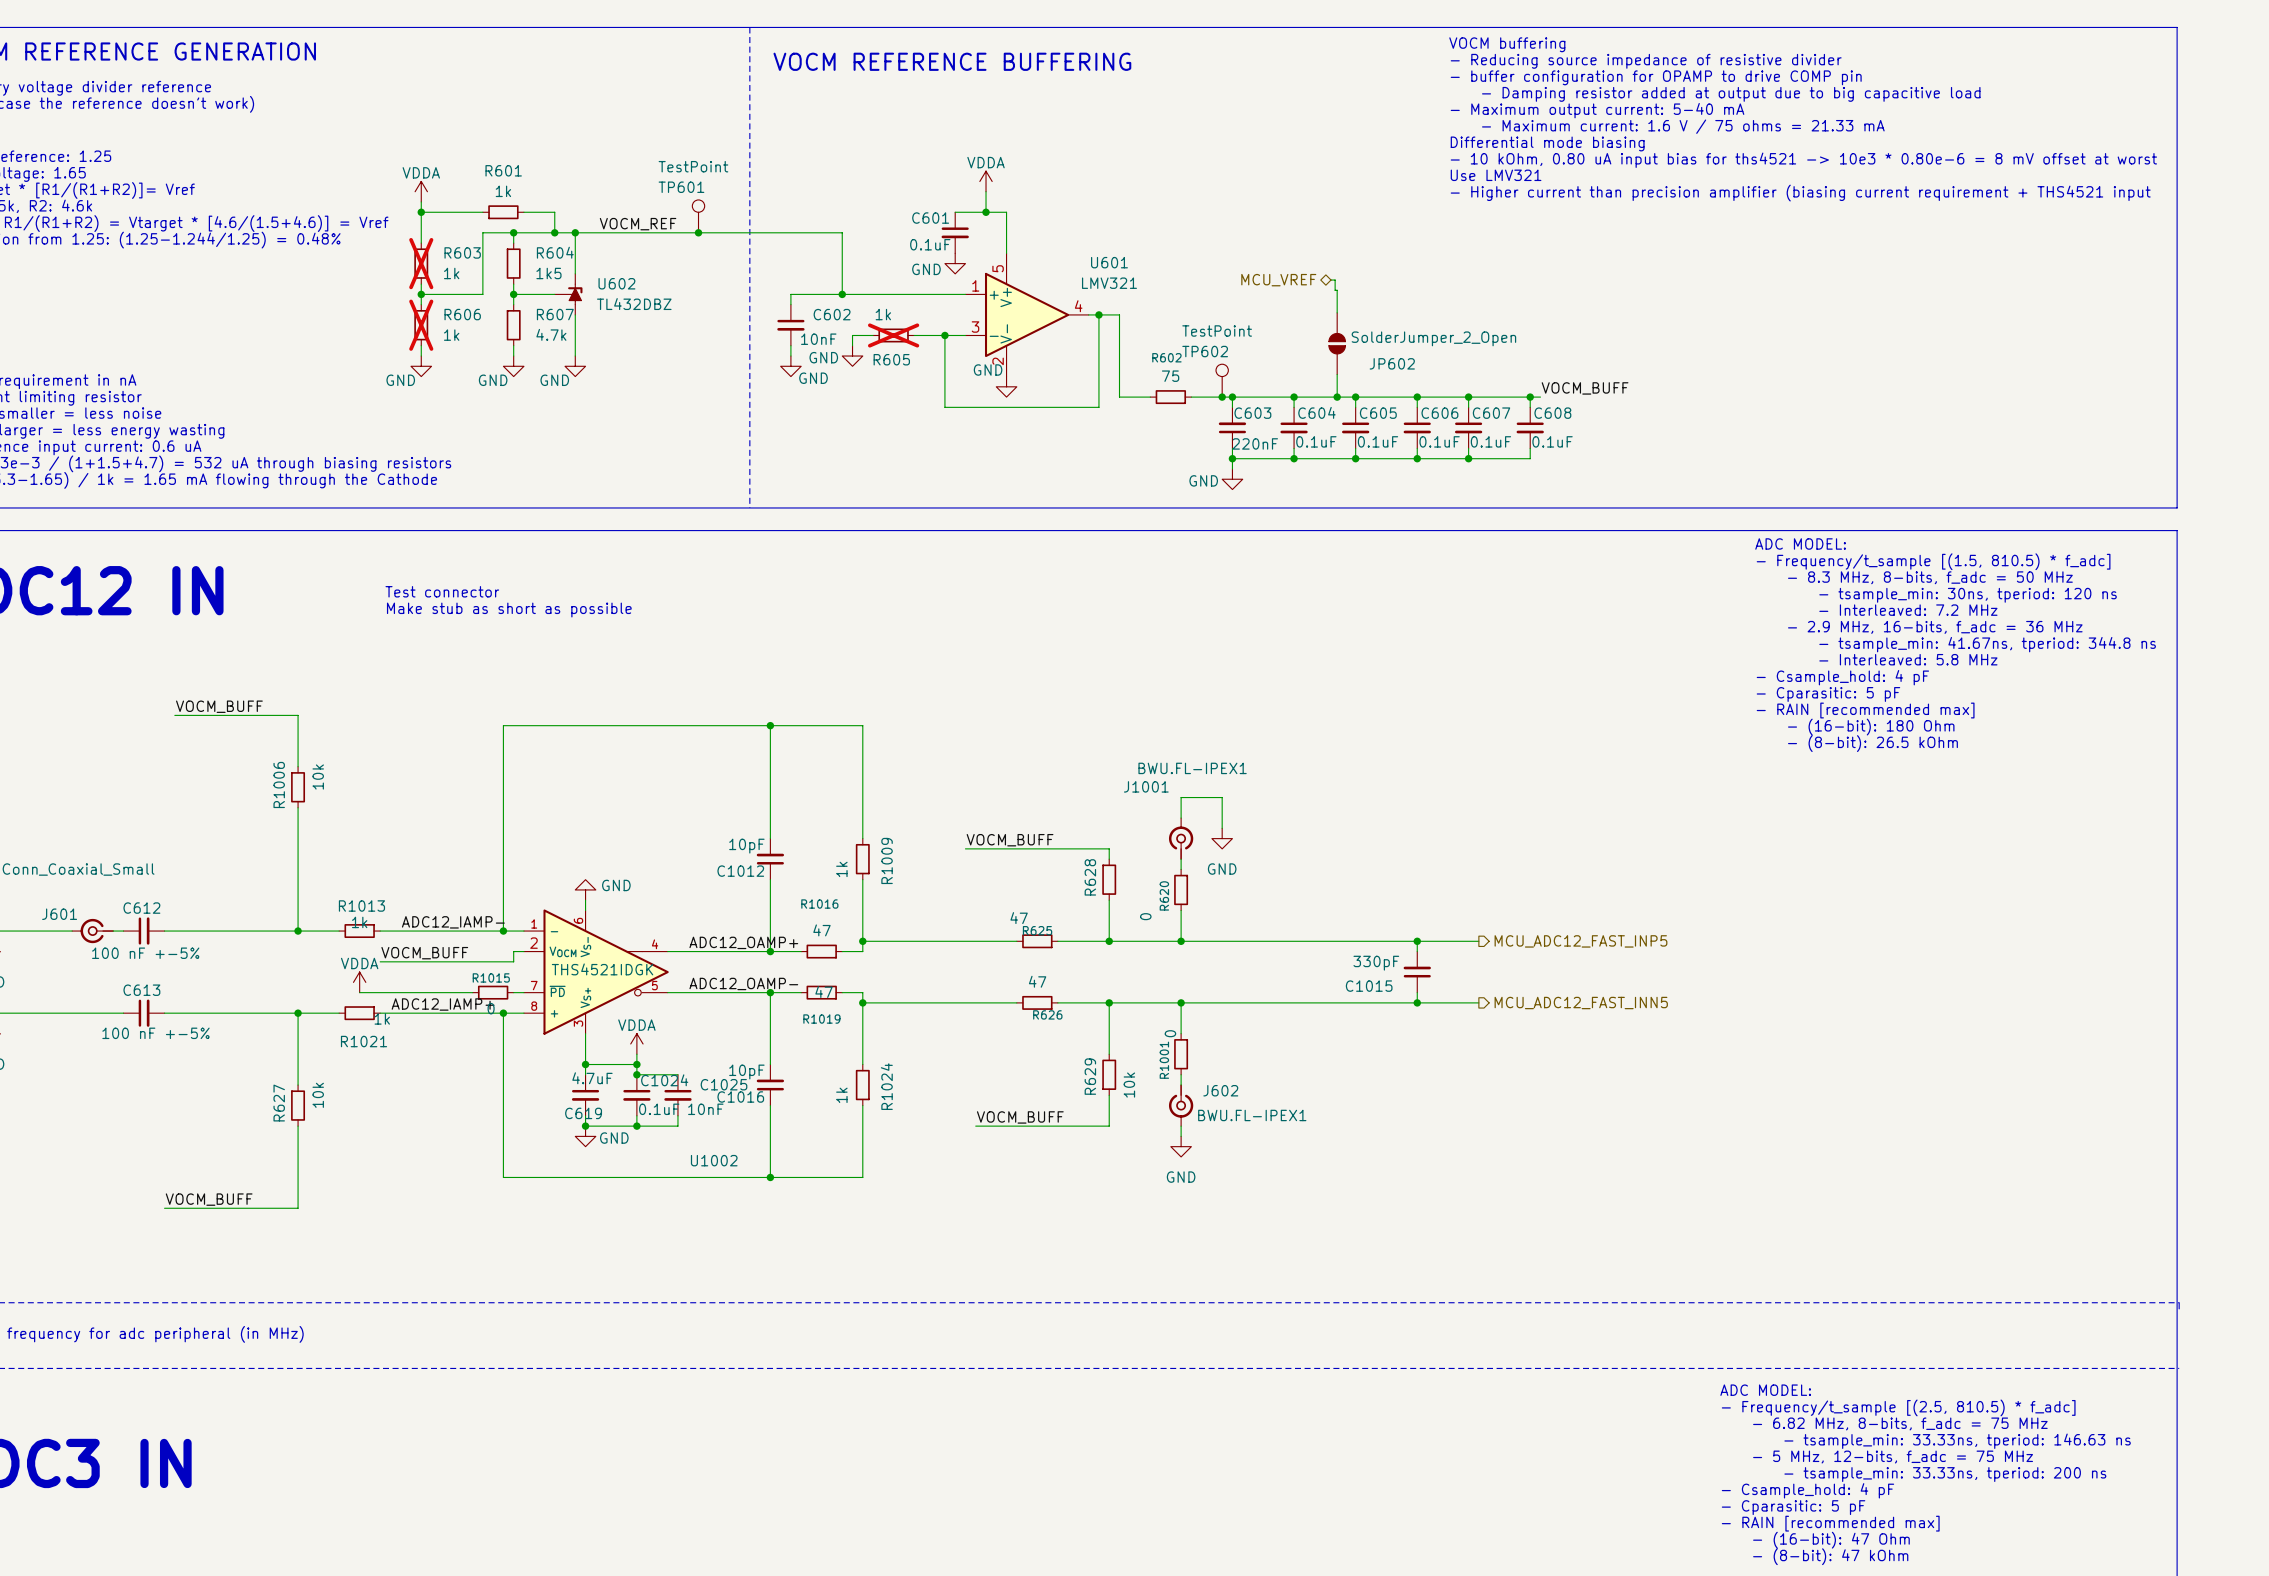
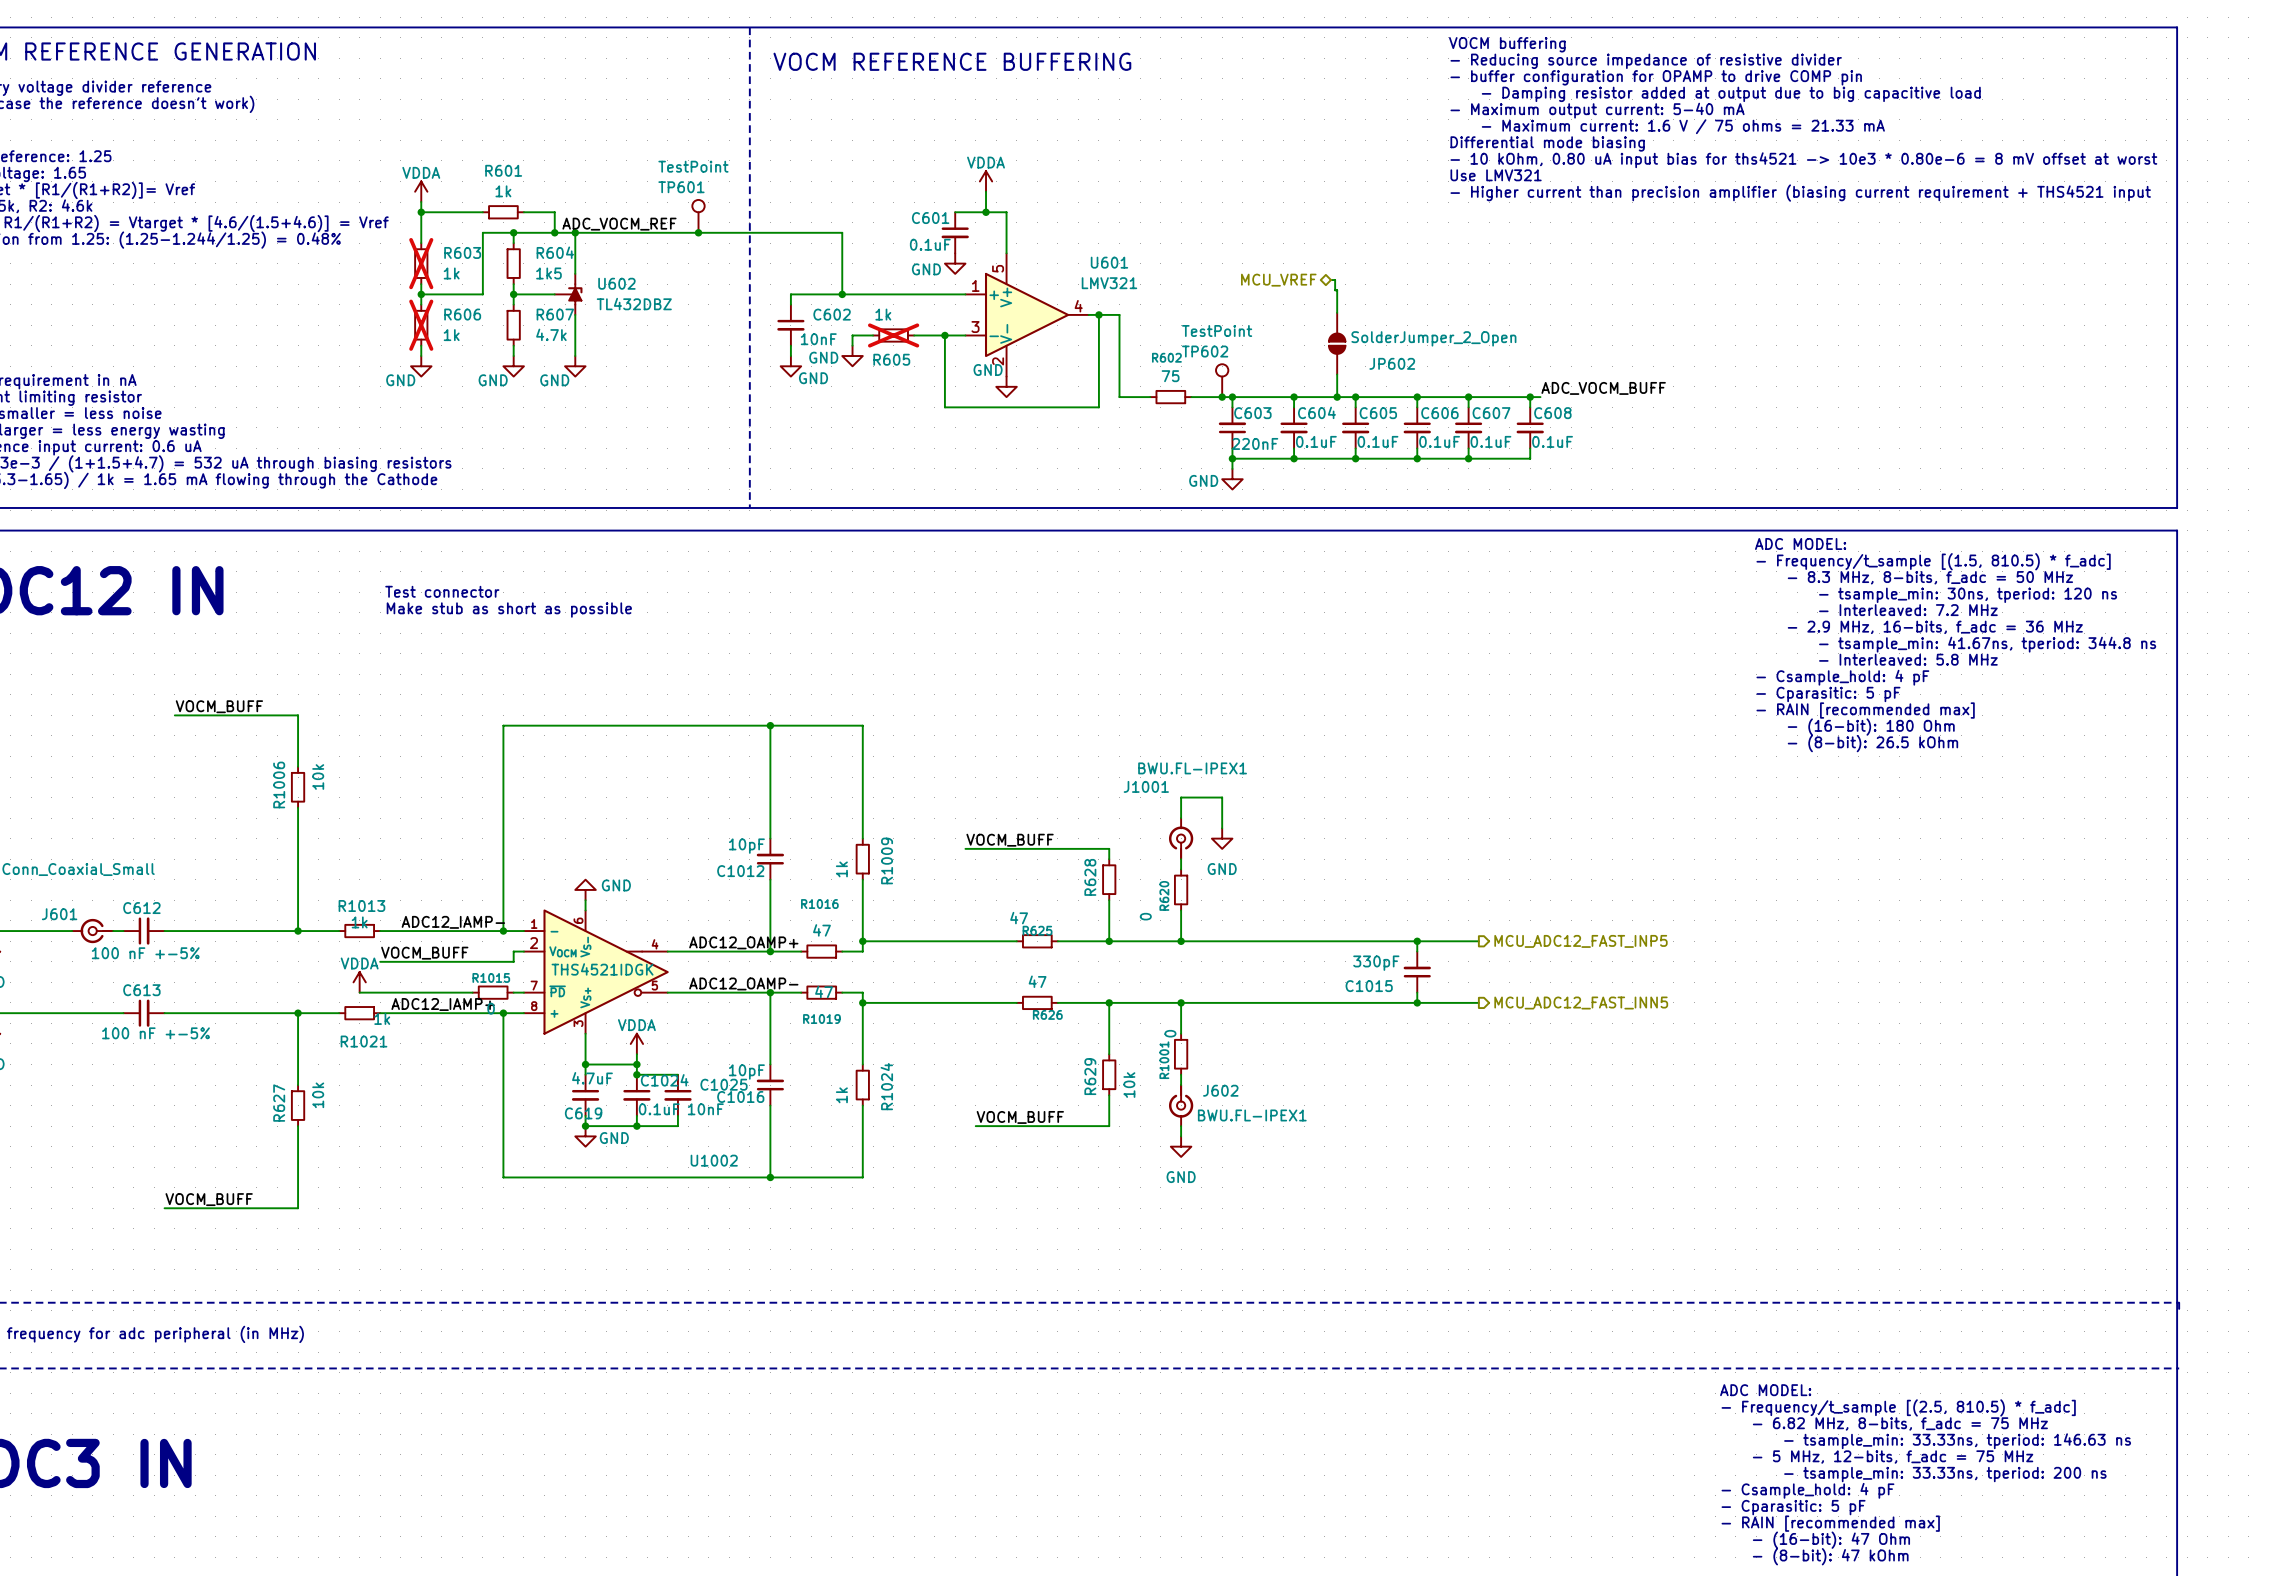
label: VOCM_REF (638, 224) -> ADC_VOCM_REF (619, 224)
label: VOCM_BUFF (1585, 388) -> ADC_VOCM_BUFF (1603, 388)

